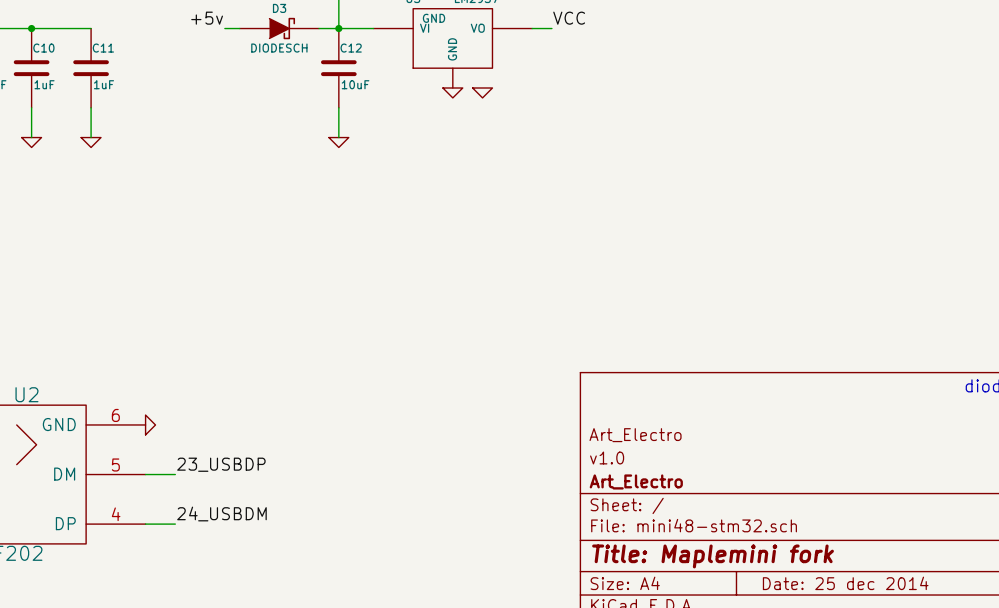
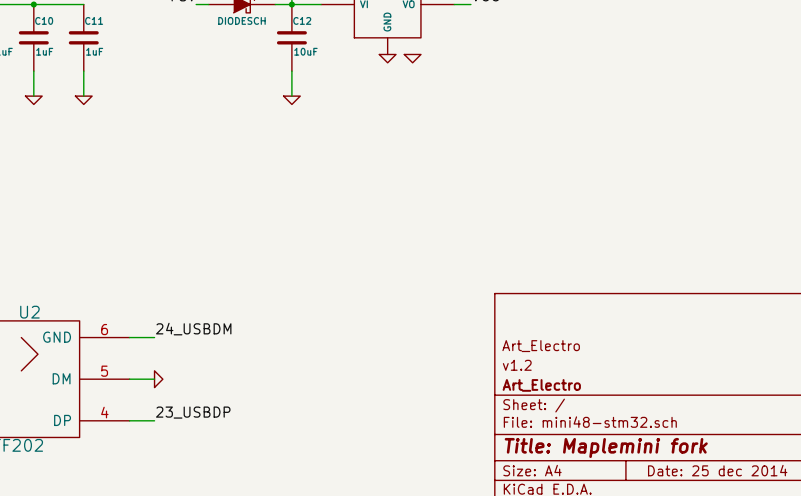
label: none -> 24_USBDM (193, 329)
wire: none -> (129, 337) (154, 337)
power symbol position: (150, 424) -> (158, 379)
title block: v1.0 (607, 458) -> v1.2 (517, 365)
label: 23_USBDP (221, 464) -> none
label: 24_USBDM (221, 514) -> 23_USBDP (193, 412)

